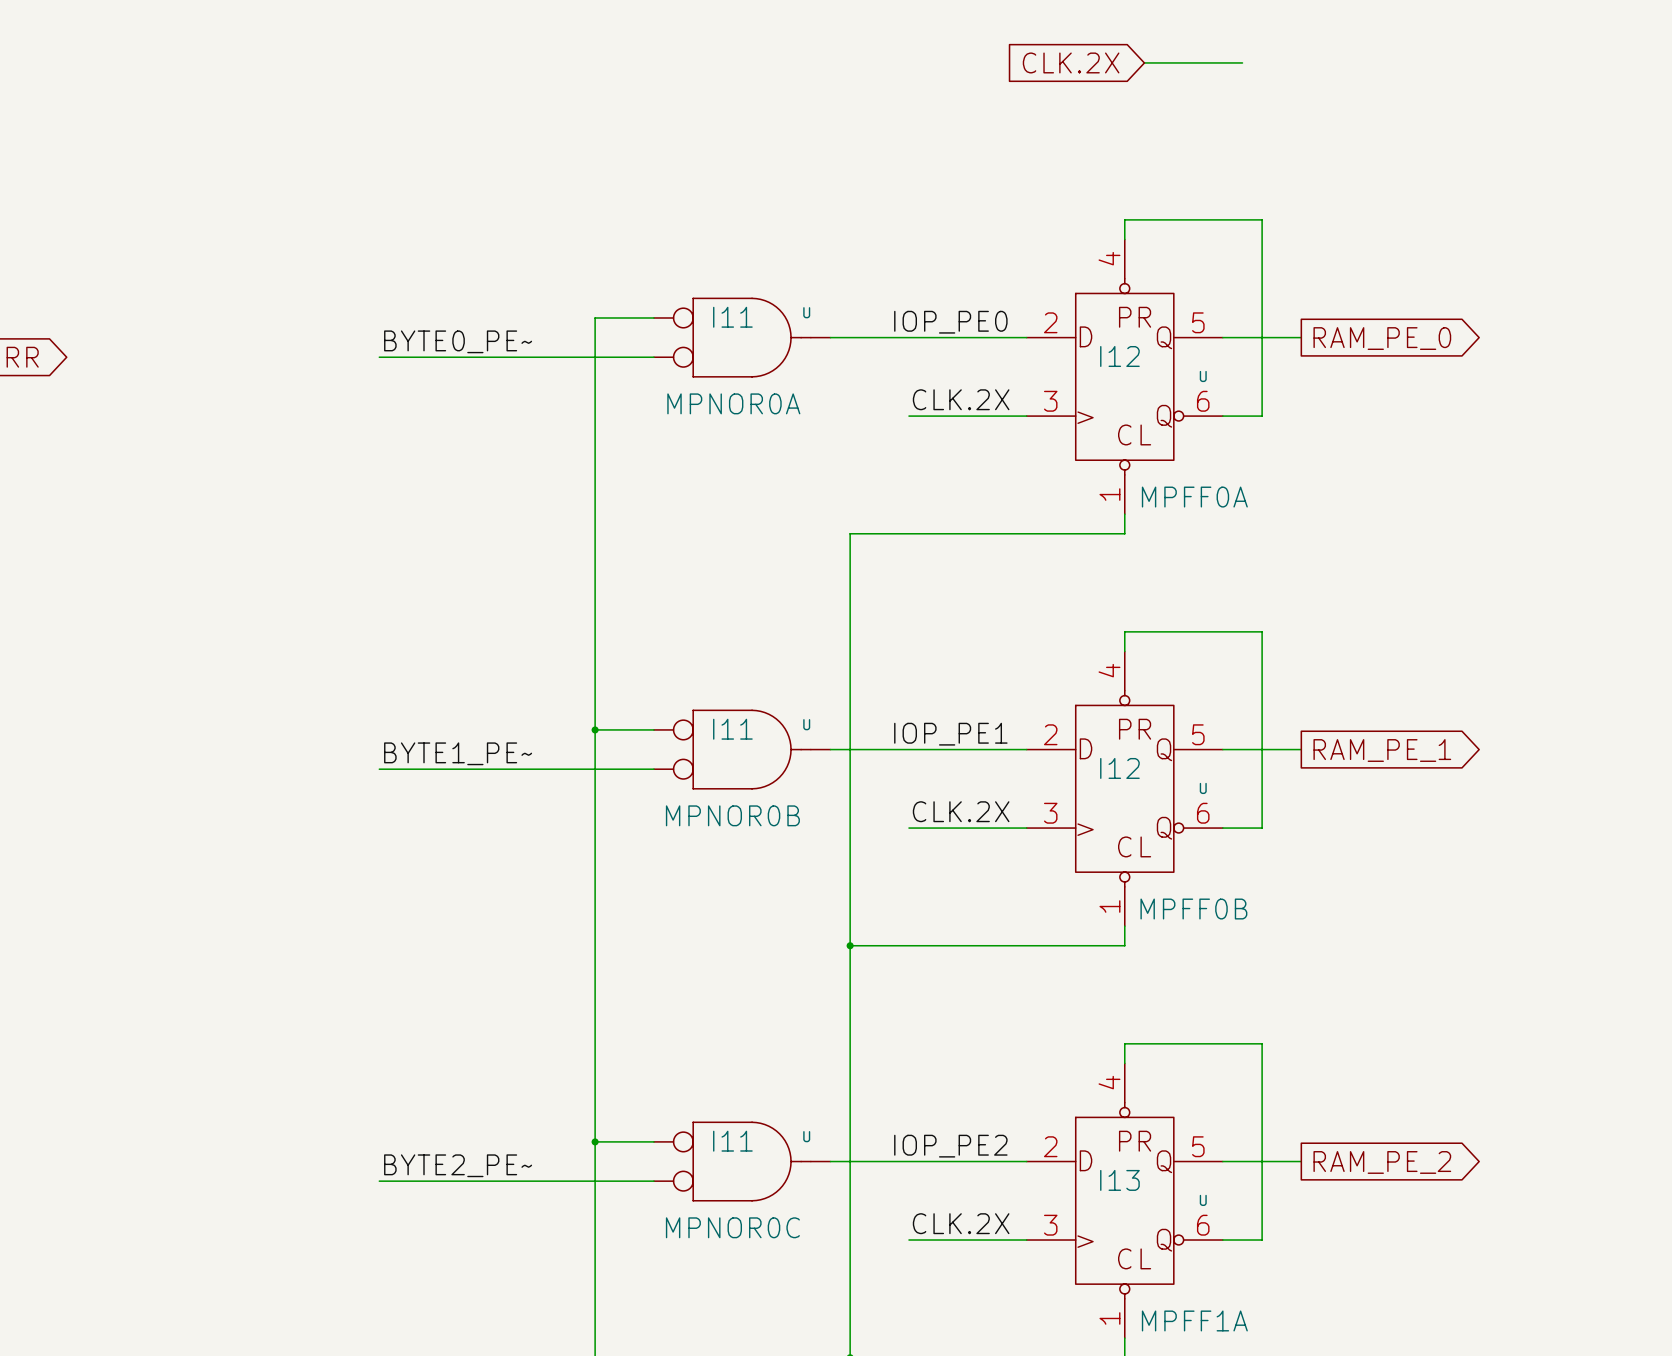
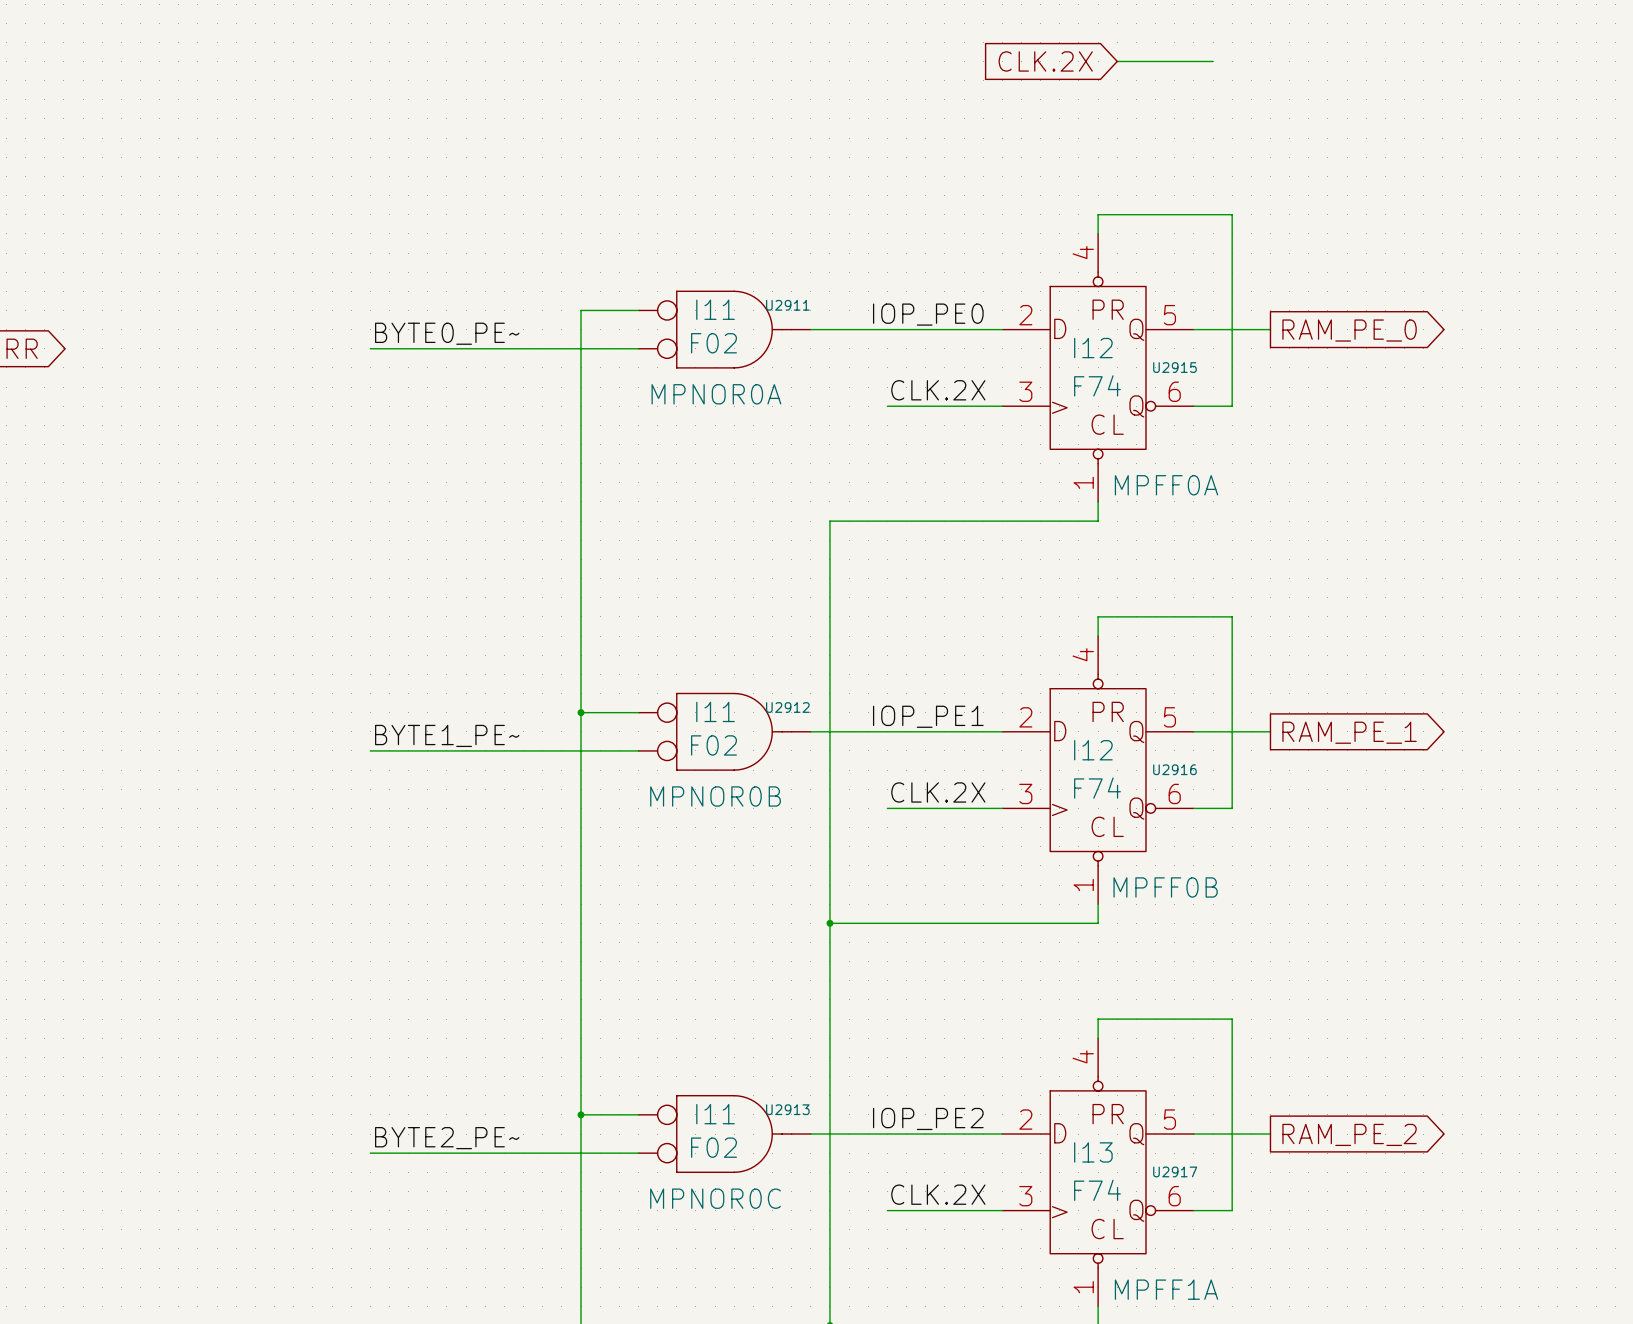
U name: U (806, 312) -> U2911 (787, 305)
U value: none -> F02 (713, 343)
U name: U (1203, 376) -> U2915 (1174, 367)
U value: none -> F74 (1097, 385)
U name: U (806, 724) -> U2912 (787, 707)
U value: none -> F02 (713, 745)
U name: U (1203, 788) -> U2916 (1174, 769)
U value: none -> F74 (1097, 788)
U name: U (806, 1136) -> U2913 (787, 1109)
U value: none -> F02 (713, 1147)
U name: U (1203, 1200) -> U2917 (1175, 1171)
U value: none -> F74 (1097, 1190)

